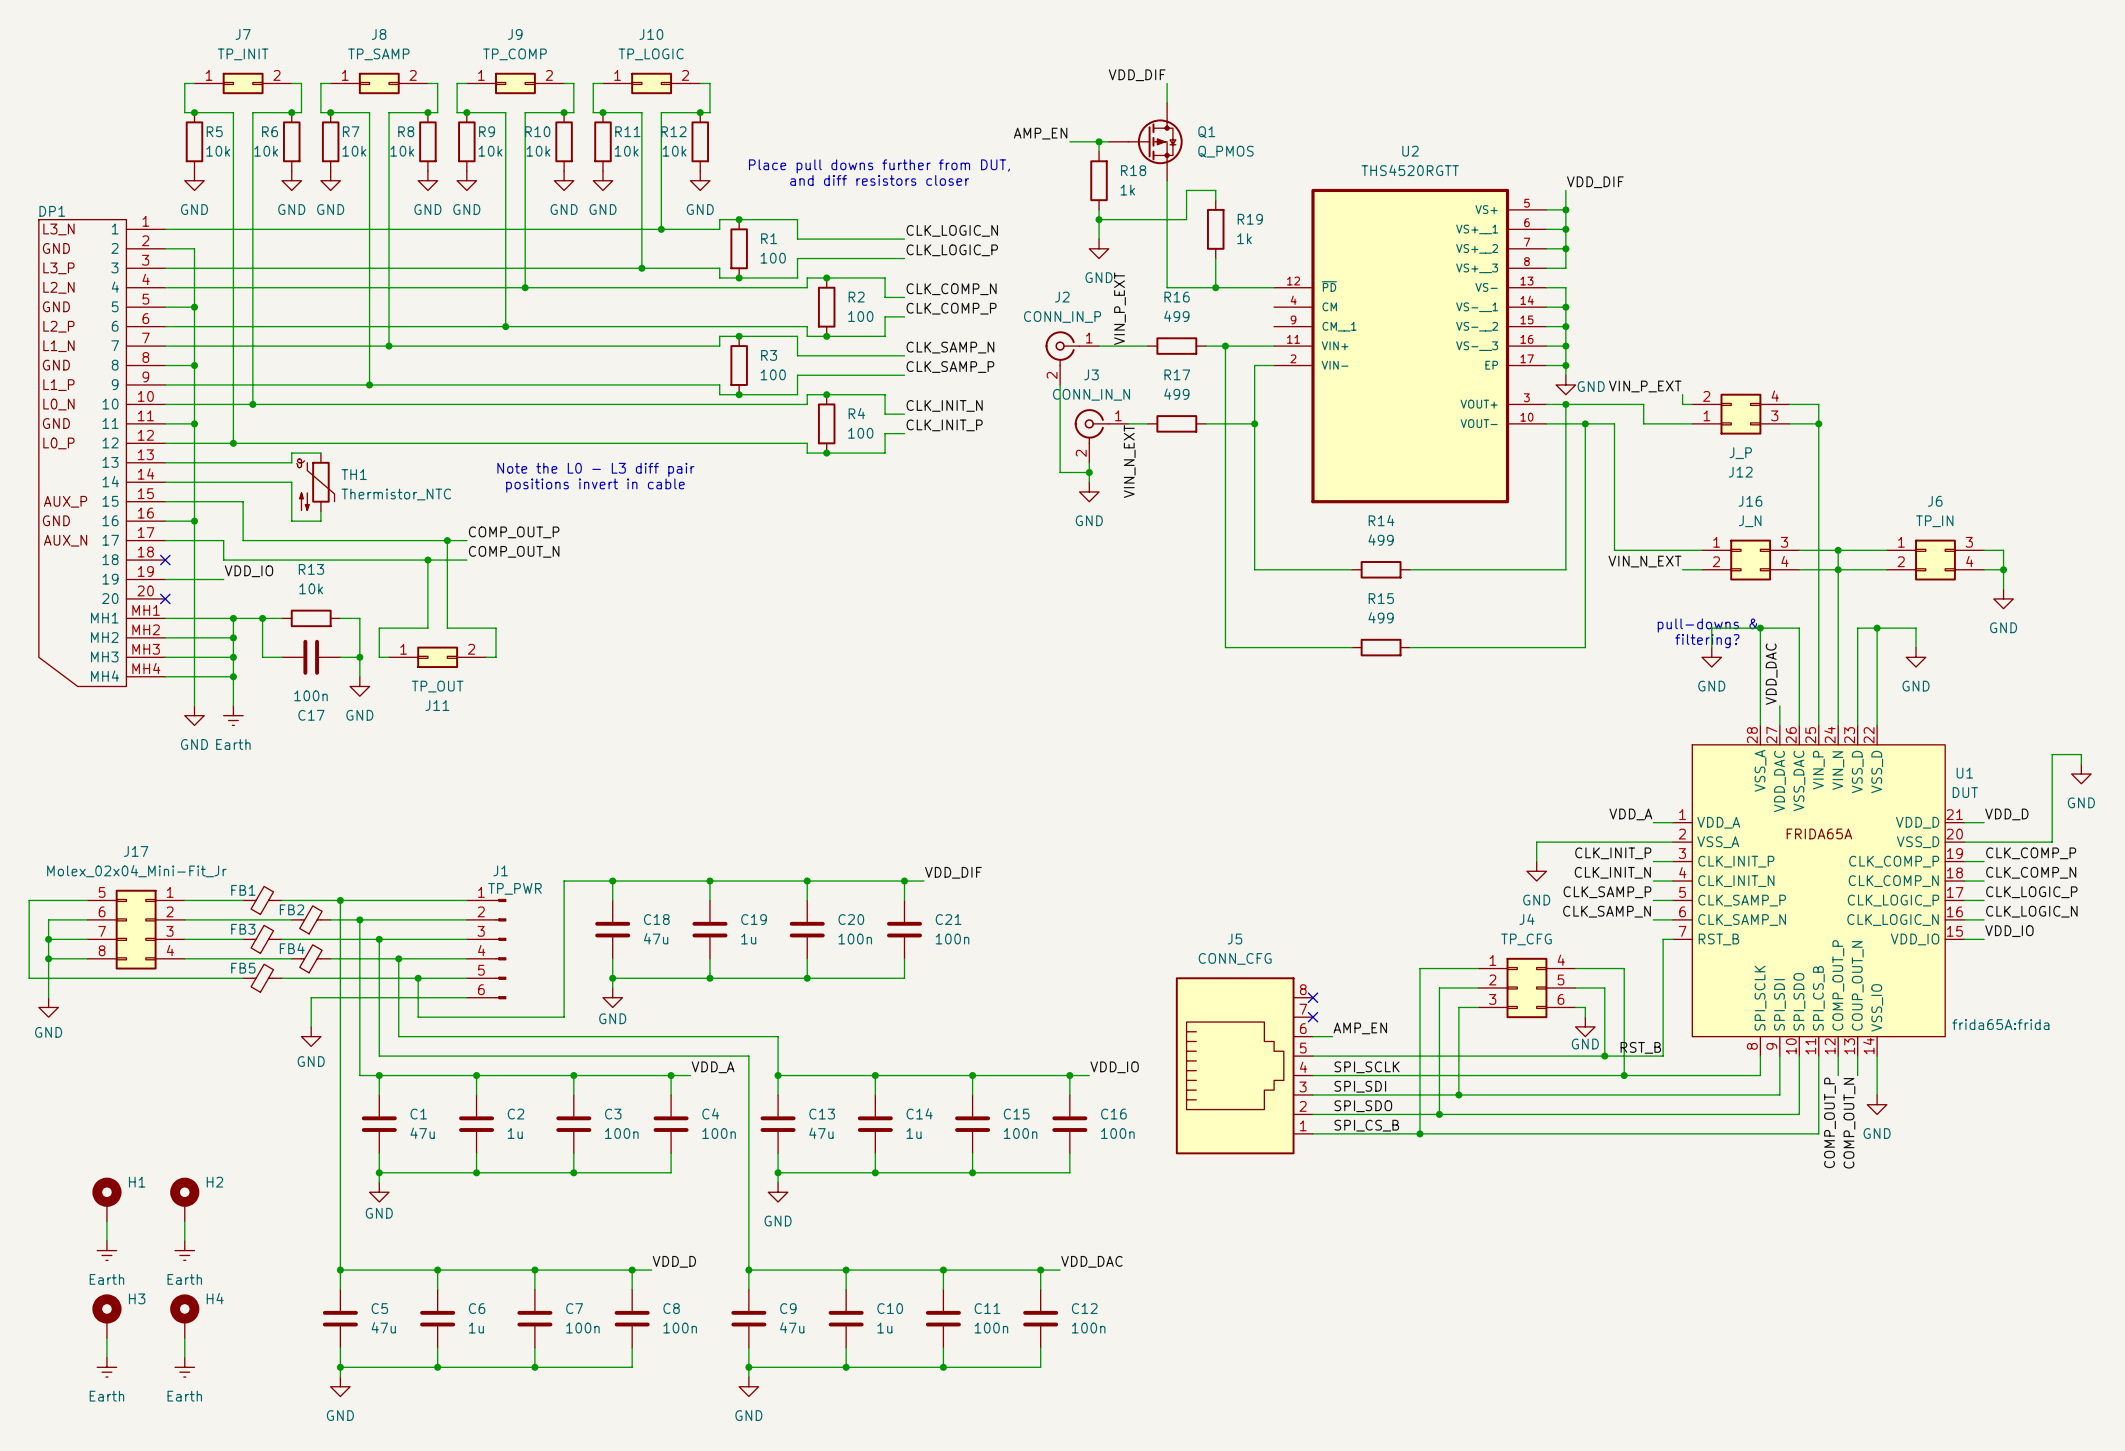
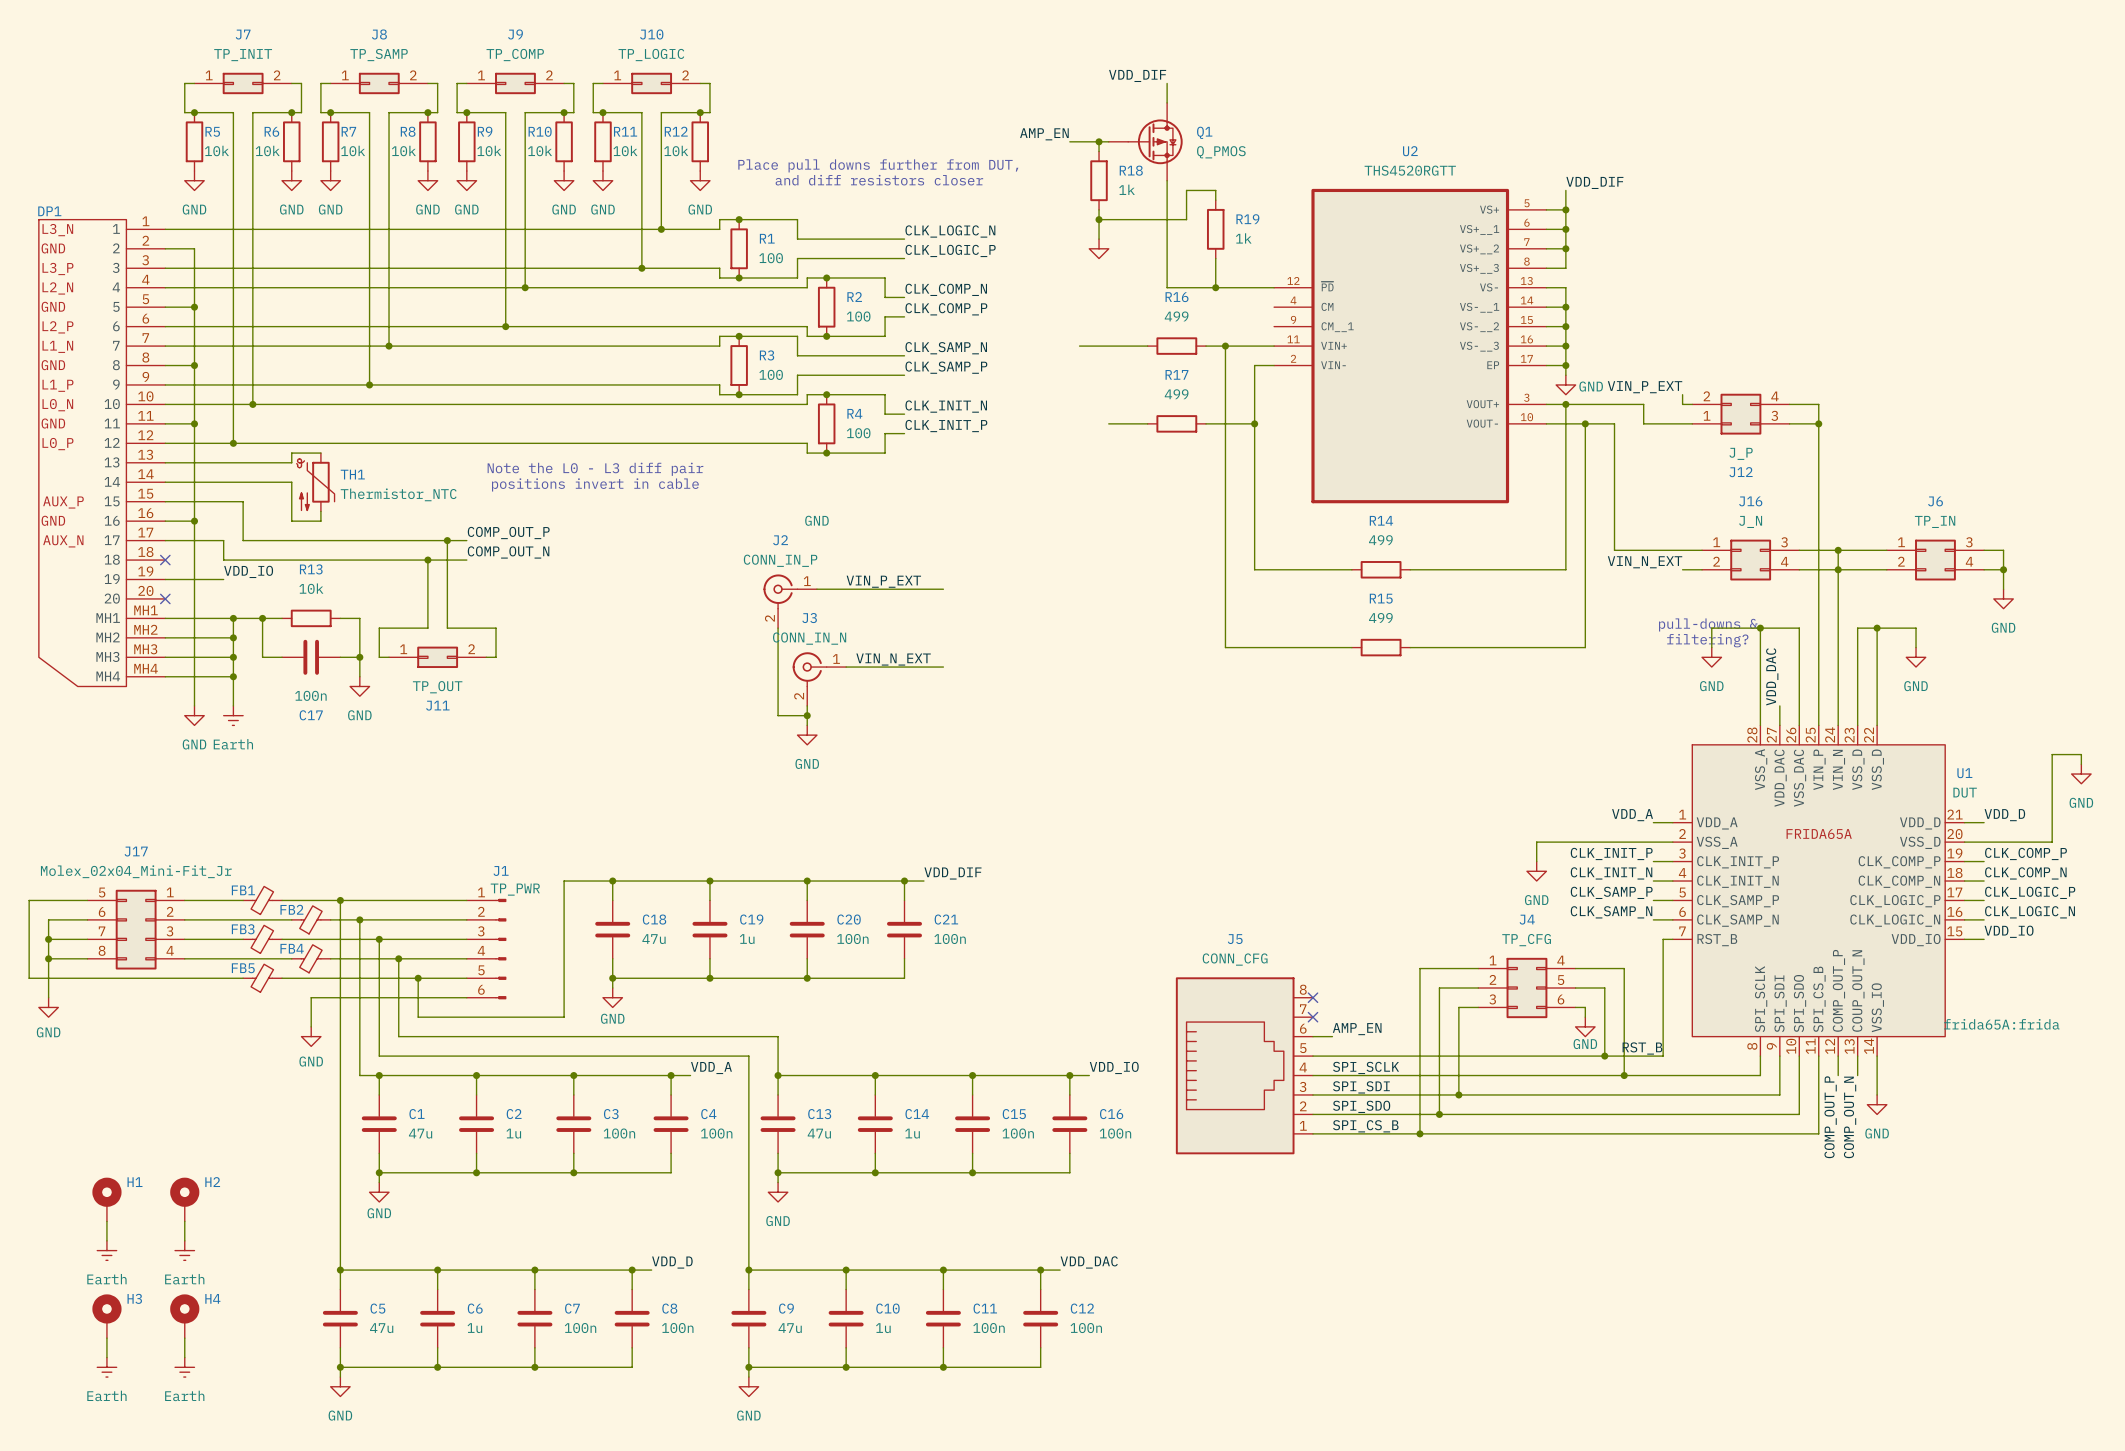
power symbol text position: GND (1099, 277) -> GND (816, 520)
label: VIN_P_EXT (1119, 308) -> none
J2 position: (1072, 358) -> (790, 601)
wire: (1060, 384) (1060, 472) (1089, 472) -> none
J3 position: (1101, 435) -> (819, 679)
label: VIN_N_EXT (1129, 461) -> none
wire: (1089, 462) (1089, 482) -> none
junction: (1089, 472) -> none
power symbol: GND (1089, 491) -> none
label: none -> VIN_P_EXT (883, 581)
wire: none -> (816, 589) (943, 589)
wire: none -> (778, 628) (778, 715) (807, 715)
label: none -> VIN_N_EXT (893, 659)
wire: none -> (846, 667) (943, 667)
wire: none -> (807, 705) (807, 725)
junction: none -> (807, 715)
power symbol: none -> GND (807, 735)

